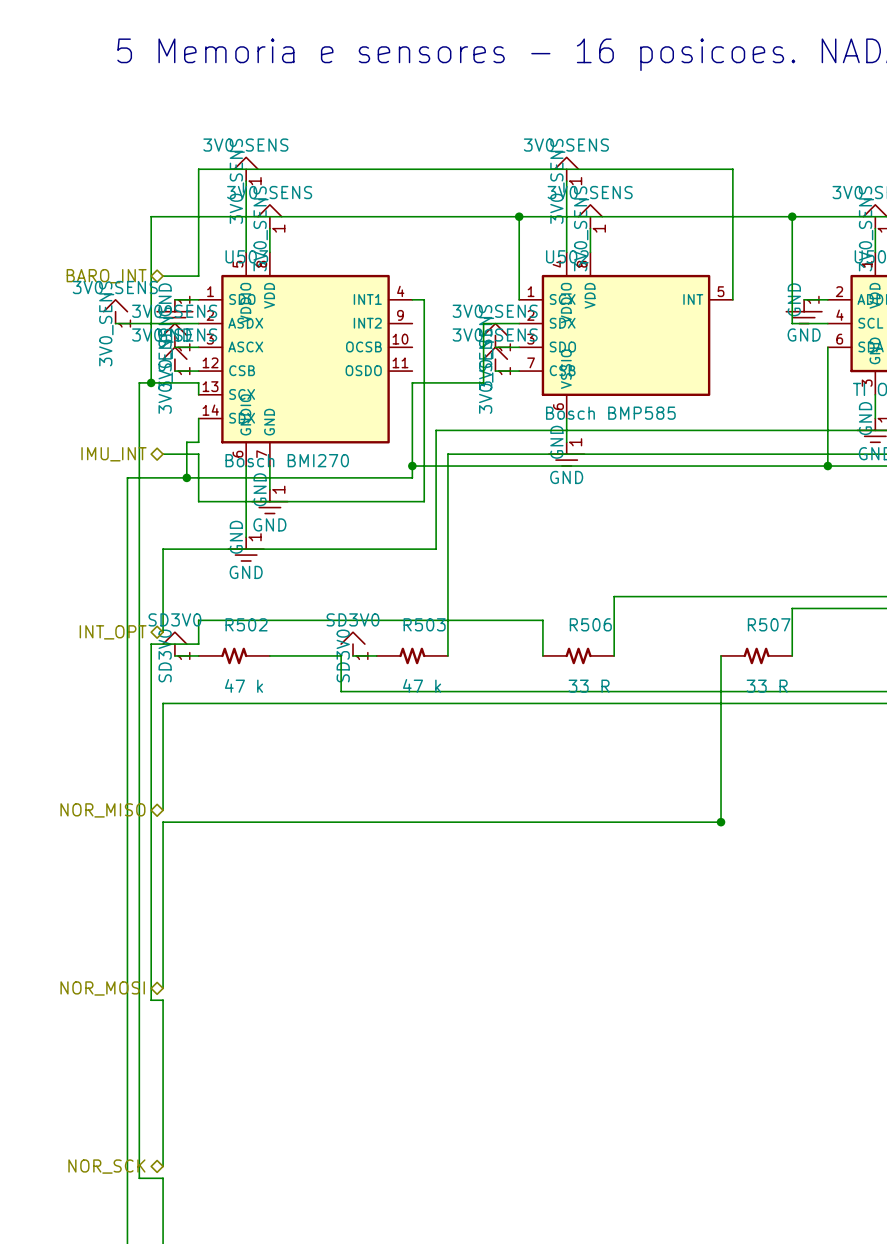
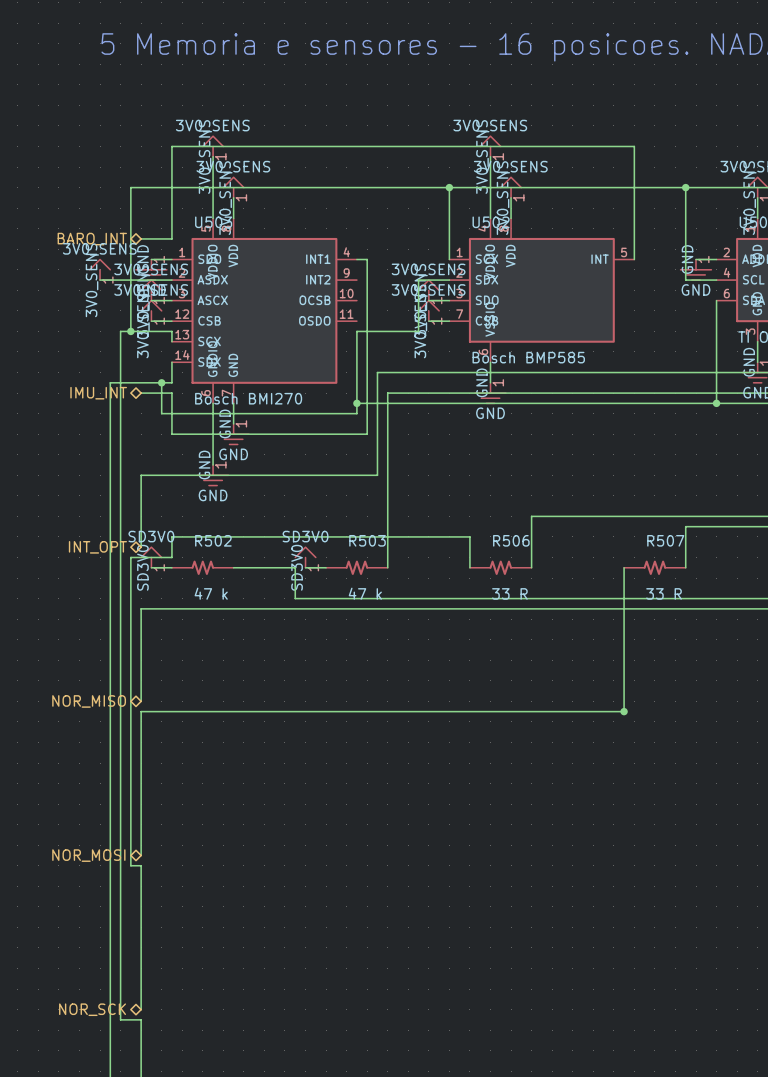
wire: (127, 477) (186, 477) -> (110, 413) (110, 382) (161, 382)
junction position: (186, 477) -> (161, 382)

